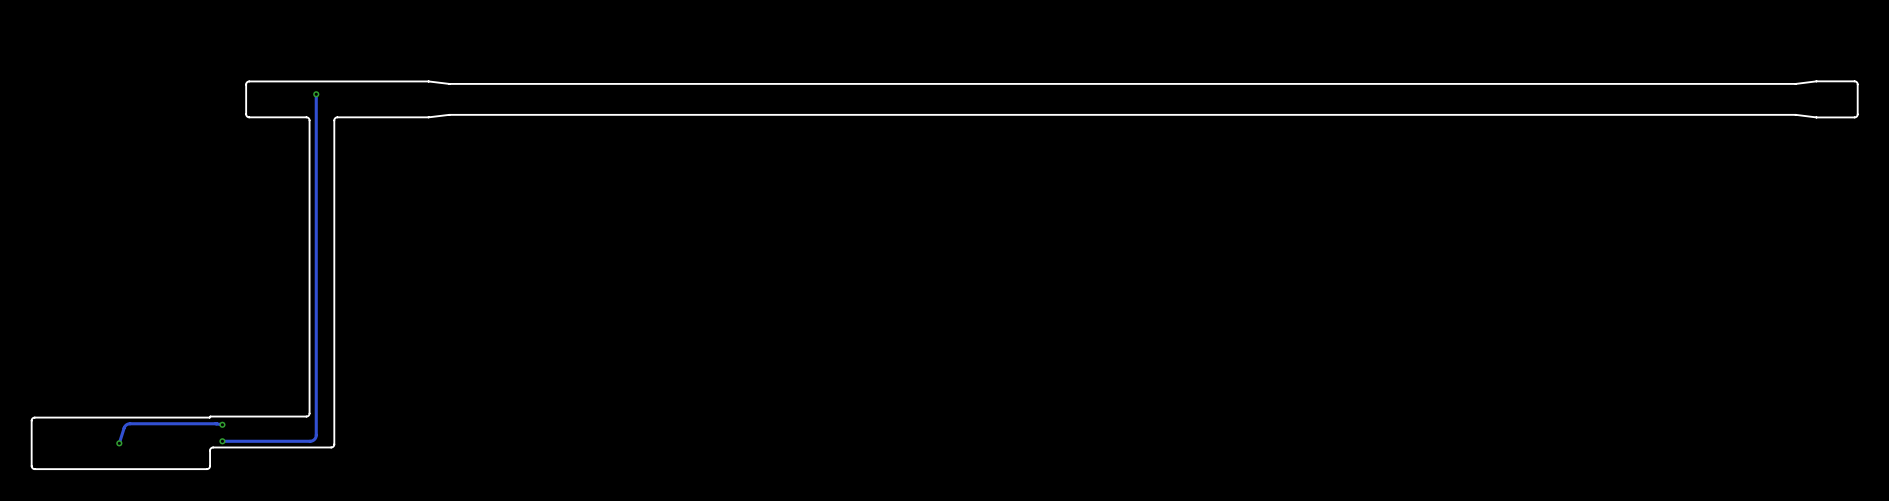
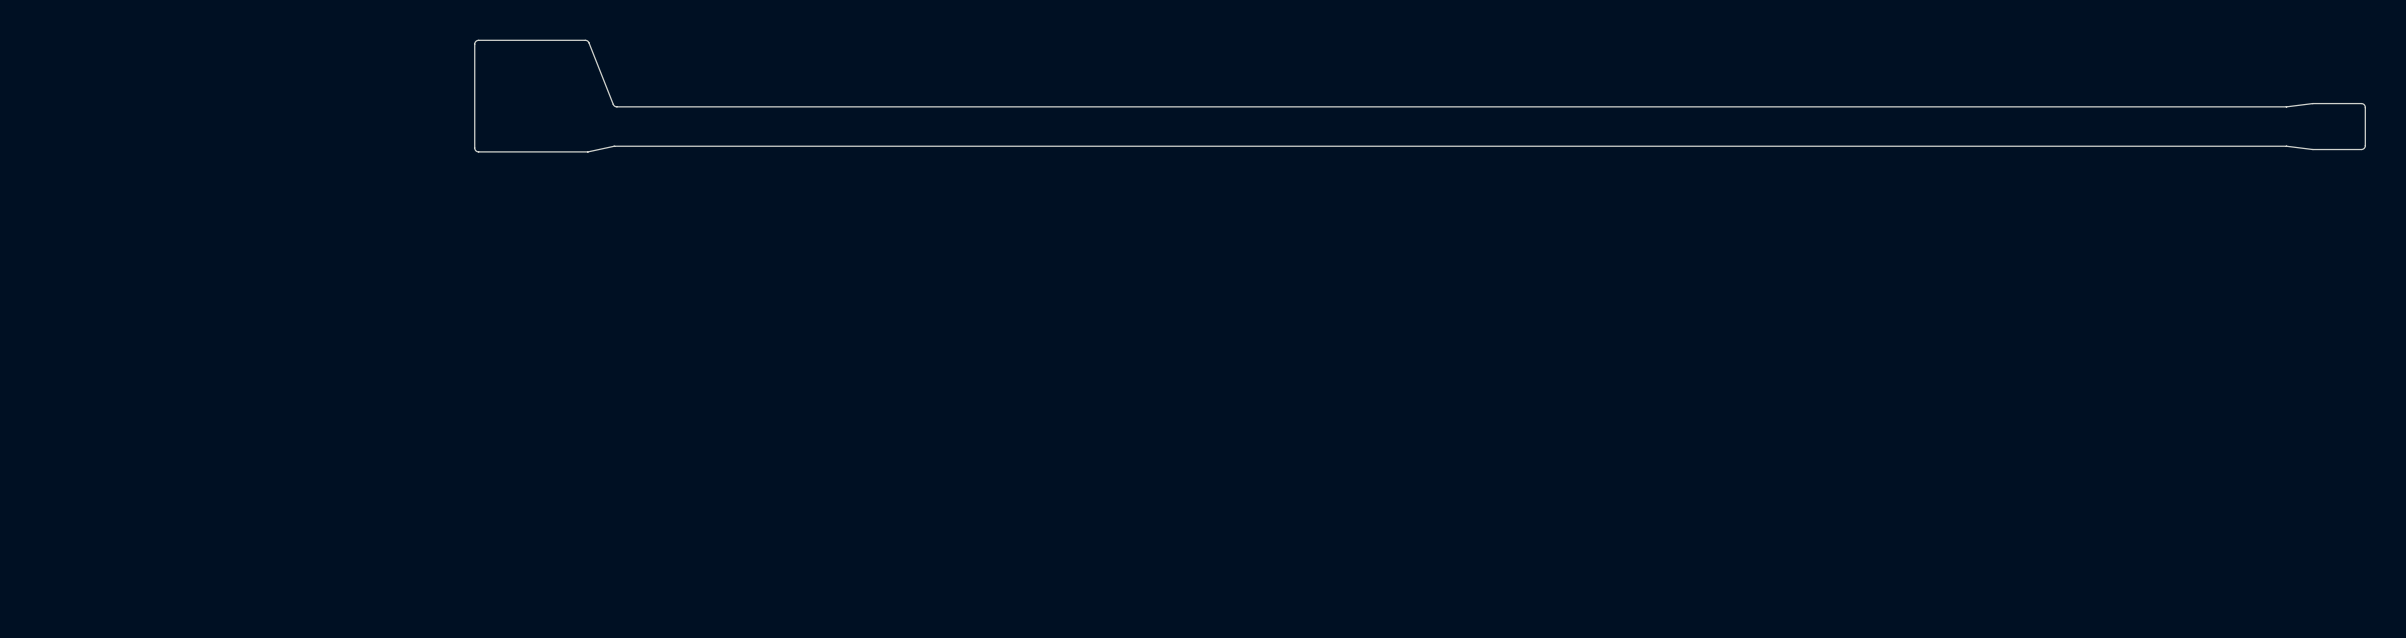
board edge: (484, 83) (449, 83) (428, 81) (246, 82) (247, 116) (306, 117) (309, 119) (309, 413) (306, 416) (210, 417) -> (616, 106) (613, 104) (587, 40) (478, 40) (475, 42) (476, 151) (587, 151) (614, 146)
track: (316, 94) (316, 436) (310, 441) (222, 441) -> none
via: (316, 94) -> none
board edge: (482, 114) (449, 114) (428, 117) (337, 117) (334, 119) (333, 446) (212, 447) (210, 450) (209, 466) (207, 469) (34, 469) (31, 466) (31, 420) (33, 417) (210, 417) -> none
track: (222, 424) (129, 423) (124, 427) (119, 443) -> none
via: (222, 424) -> none
via: (222, 441) -> none
via: (119, 443) -> none

